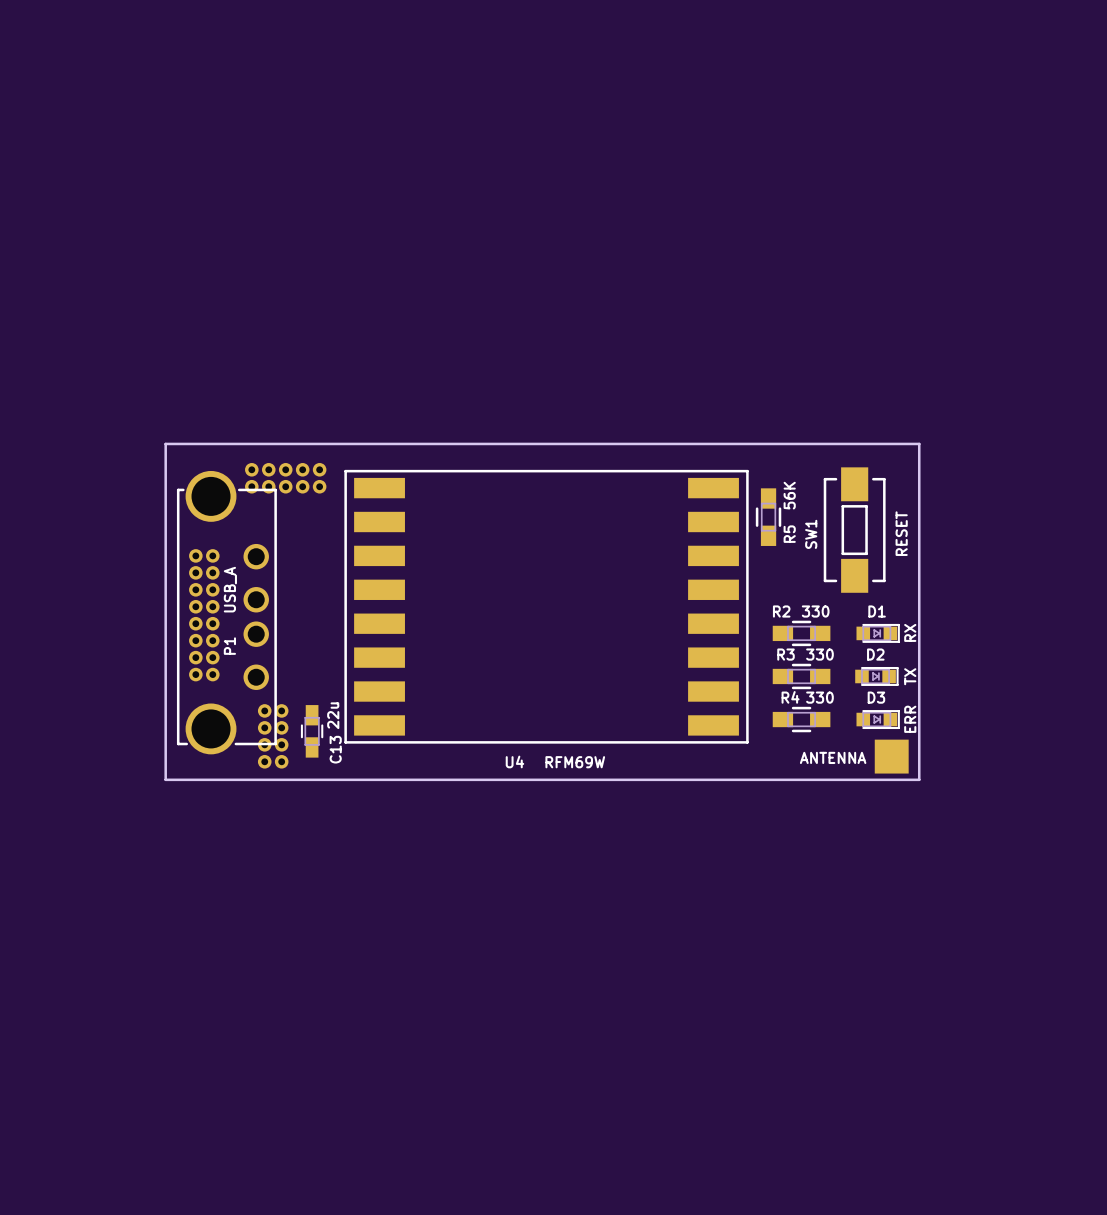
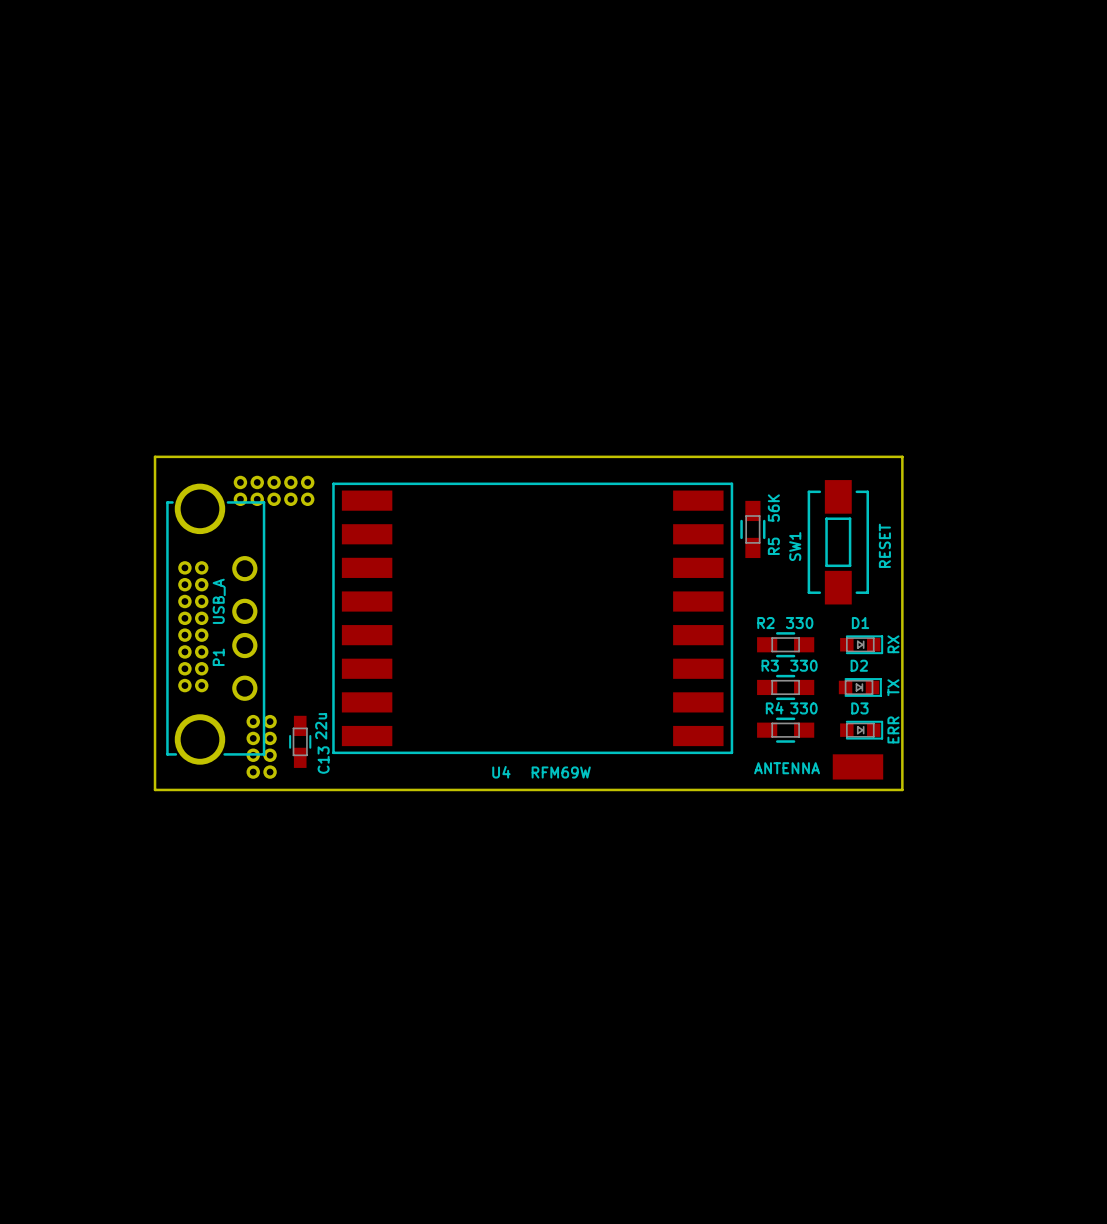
part: none -> ANTENNA (857, 766)
part: ANTENNA (891, 756) -> none

